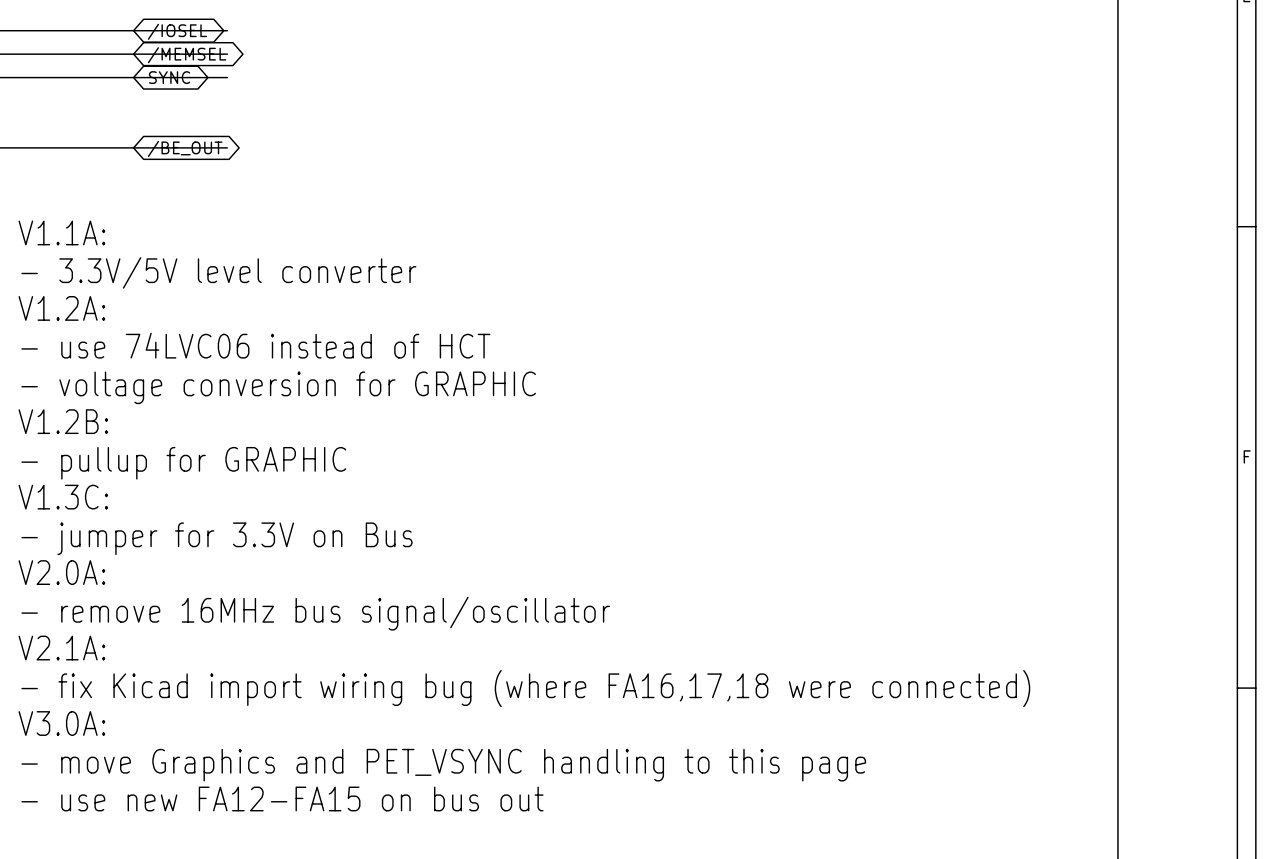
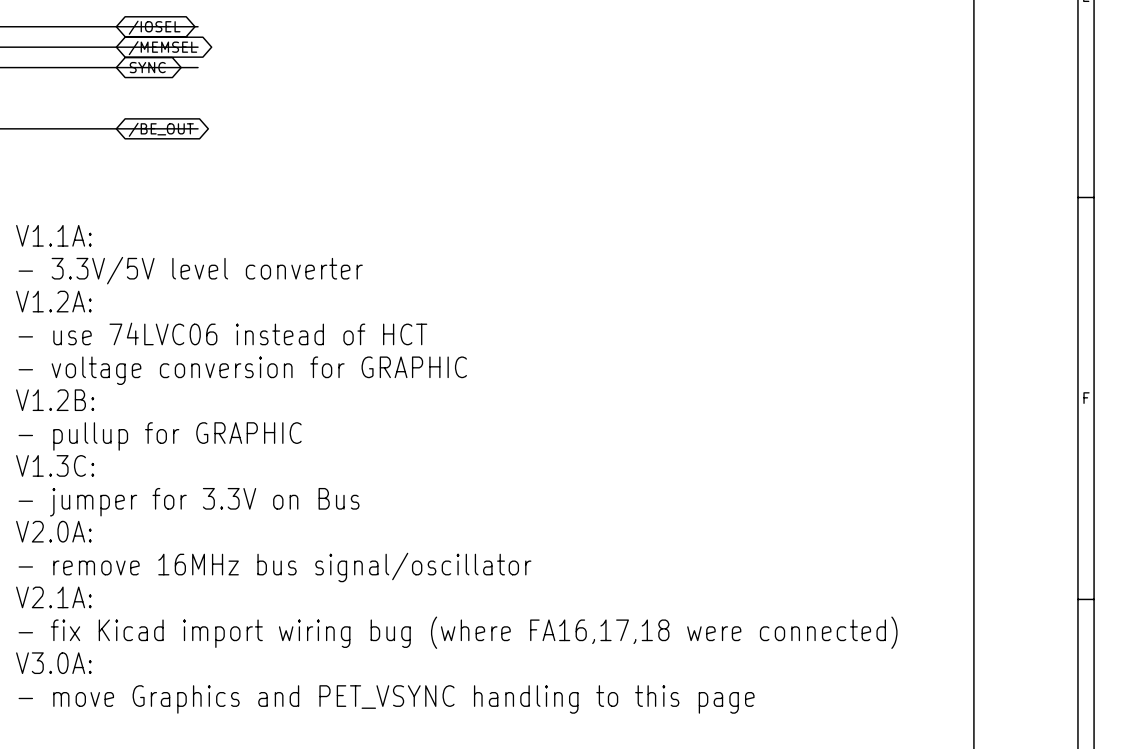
text: V1.1A: (61, 232) -> none
text: - 3.3V/5V level converter (218, 272) -> V1.1A: (53, 235)
text: V1.2A: (61, 308) -> - 3.3V/5V level converter (190, 270)
text: - use 74LVC06 instead of HCT (255, 345) -> V1.2A: (53, 301)
text: - voltage conversion for GRAPHIC (278, 387) -> - use 74LVC06 instead of HCT (222, 333)
text: V1.2B: (63, 421) -> - voltage conversion for GRAPHIC (242, 370)
text: - pullup for GRAPHIC (183, 463) -> V1.2B: (55, 400)
text: V1.3C: (63, 497) -> - pullup for GRAPHIC (160, 436)
text: - jumper for 3.3V on Bus (217, 538) -> V1.3C: (55, 465)
text: V2.0A: (61, 572) -> - jumper for 3.3V on Bus (189, 502)
text: - remove 16MHz bus signal/oscillator (315, 613) -> V2.0A: (53, 531)
text: V2.1A: (61, 648) -> - remove 16MHz bus signal/oscillator (274, 567)
text: - fix Kicad import wiring bug (where FA16,17,18 were connected) (525, 688) -> V2.1A: (53, 597)
text: V3.0A: (61, 723) -> - fix Kicad import wiring bug (where FA16,17,18 were connected) (458, 632)
text: - move Graphics and PET_VSYNC handling to this page (443, 765) -> V3.0A: (53, 663)
text: - use new FA12-FA15 on bus out (282, 798) -> - move Graphics and PET_VSYNC handling to this page (386, 699)

